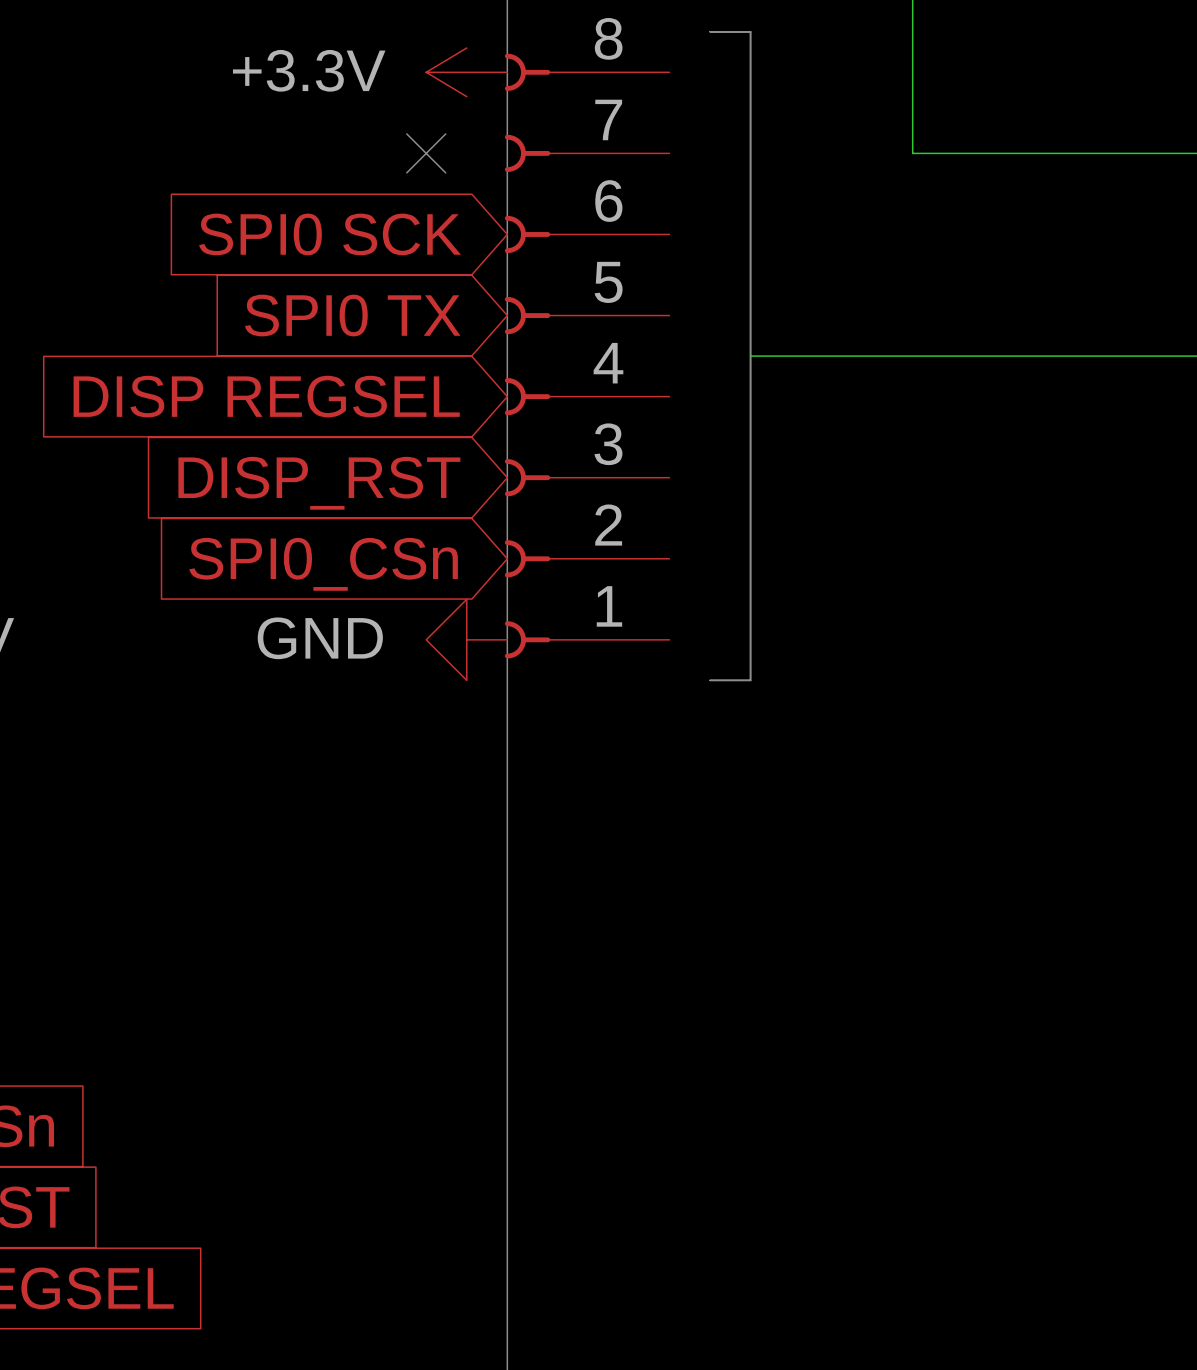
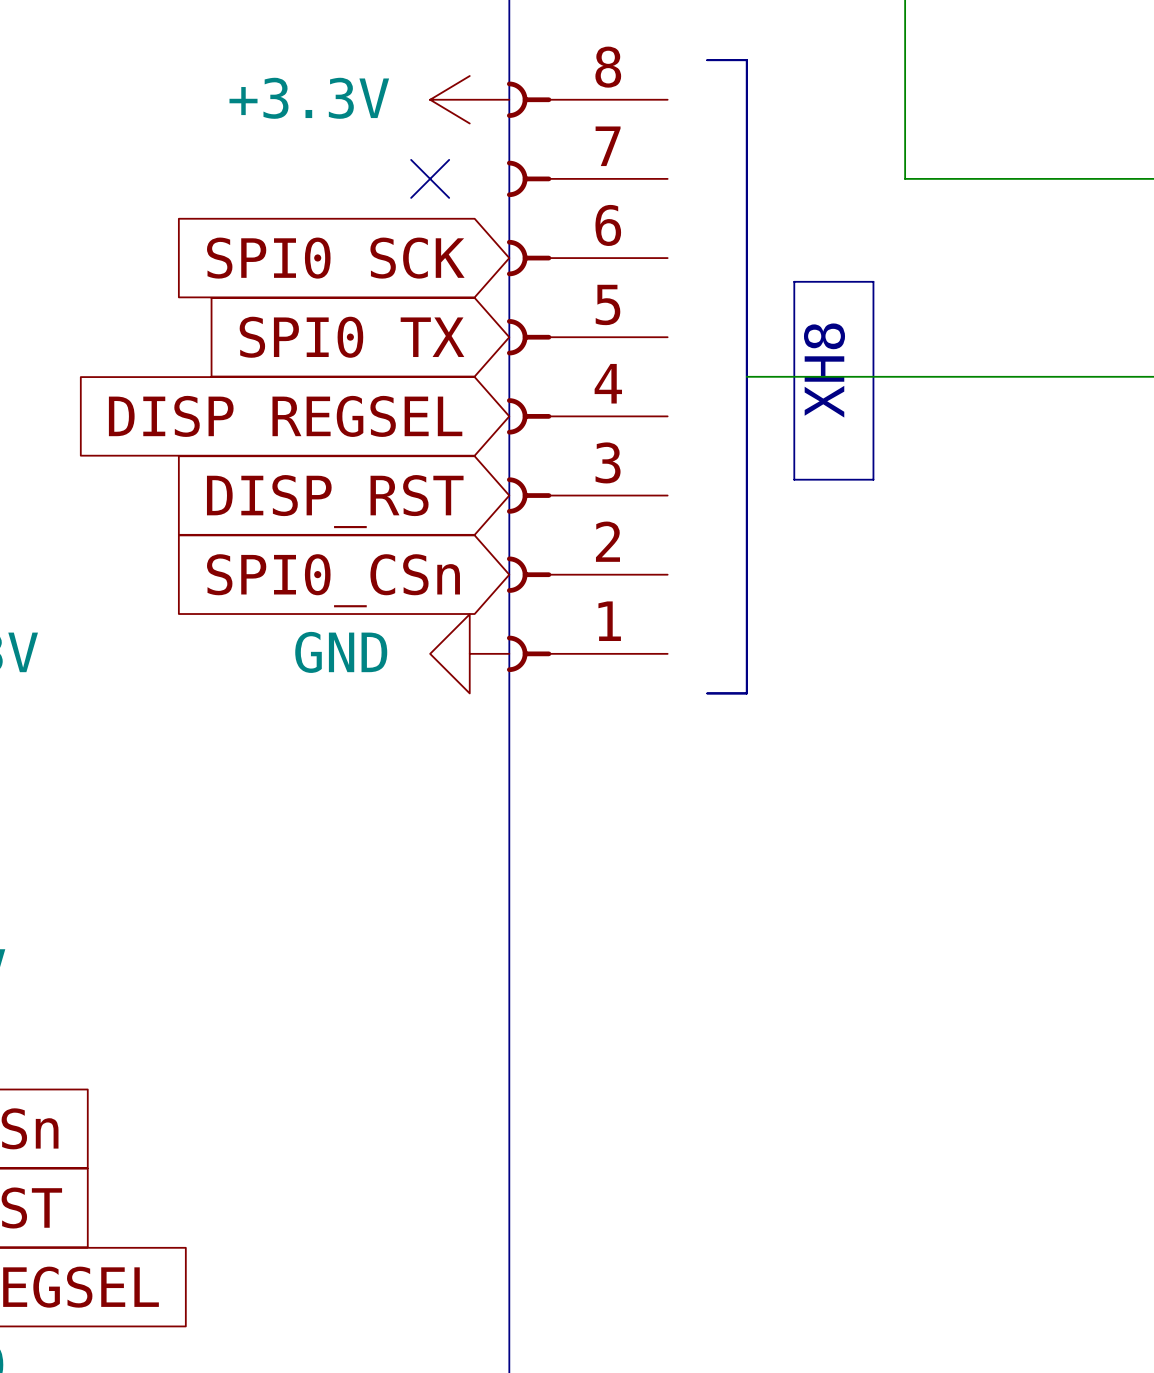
line: none -> (794, 281) (873, 281) (873, 479) (794, 479) (794, 281)
text: none -> XH8 (824, 370)

